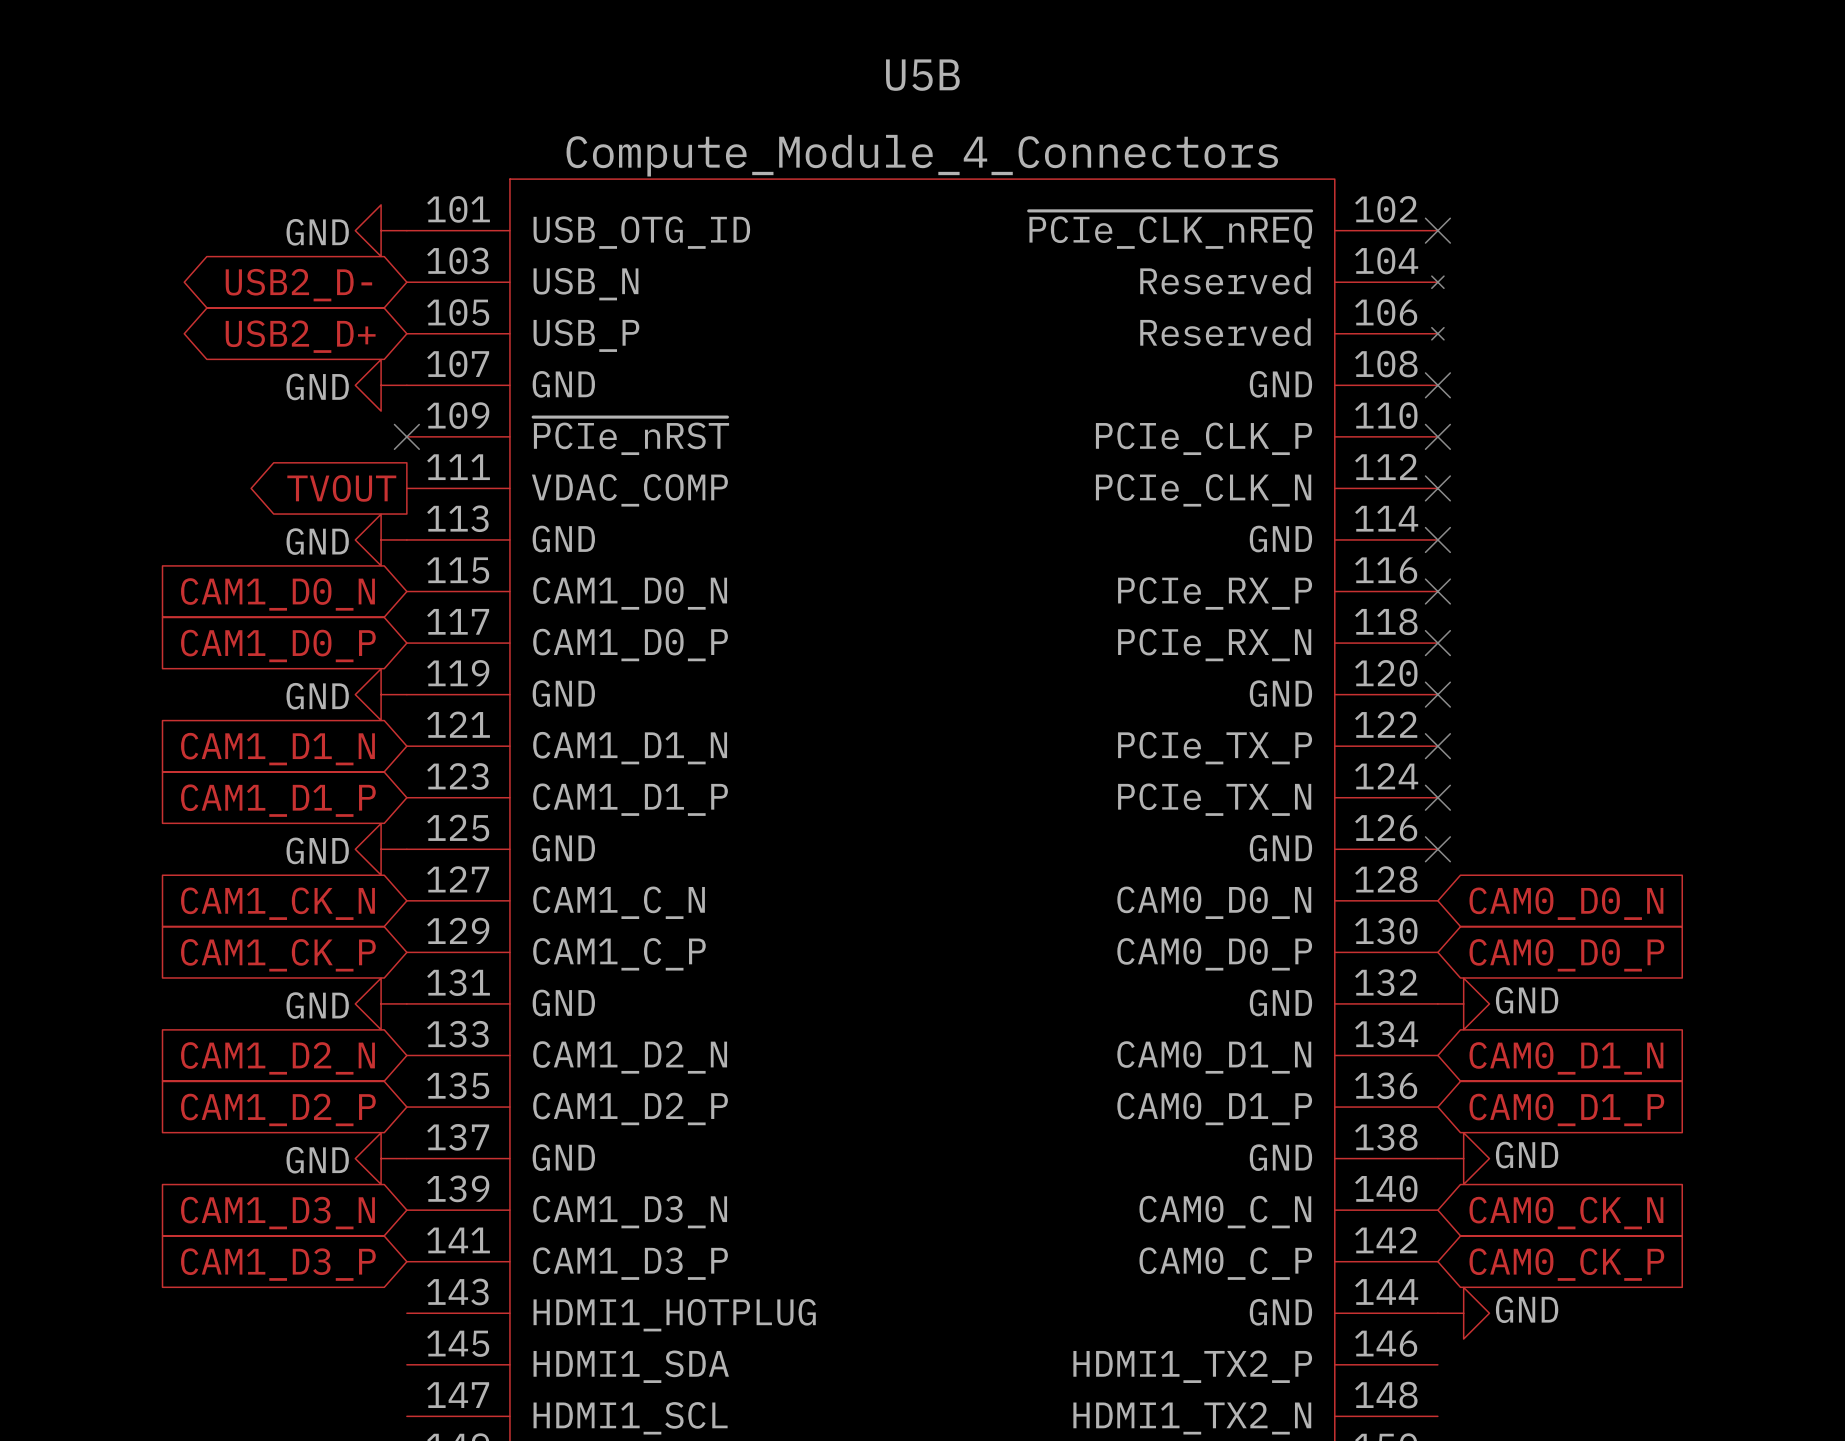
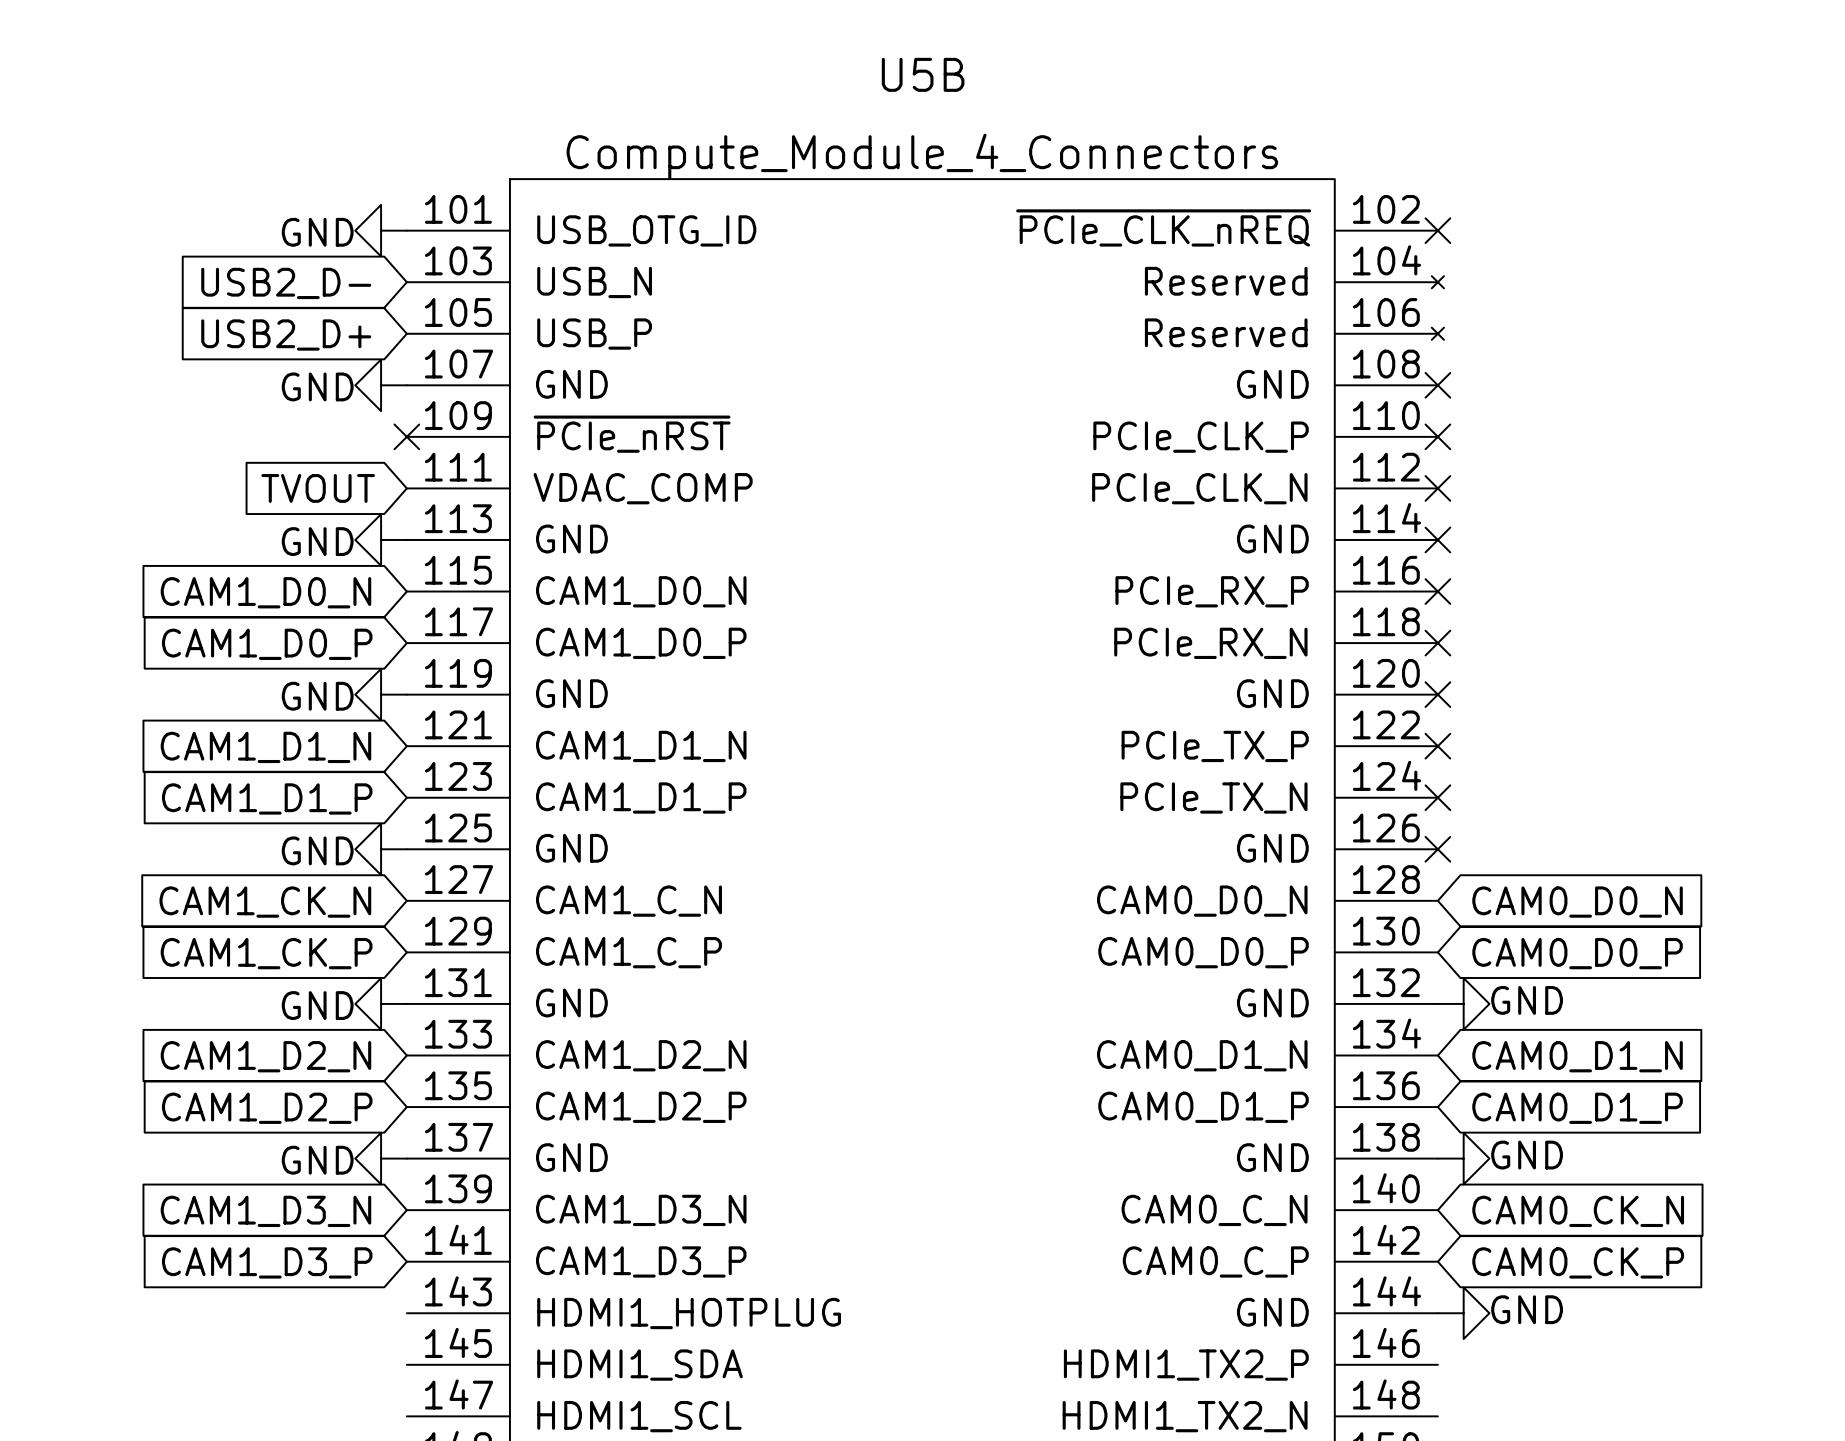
global label shape: bidirectional (298, 285) -> input (286, 283)
global label shape: bidirectional (300, 336) -> input (286, 334)
global label shape: output (341, 488) -> input (318, 488)

